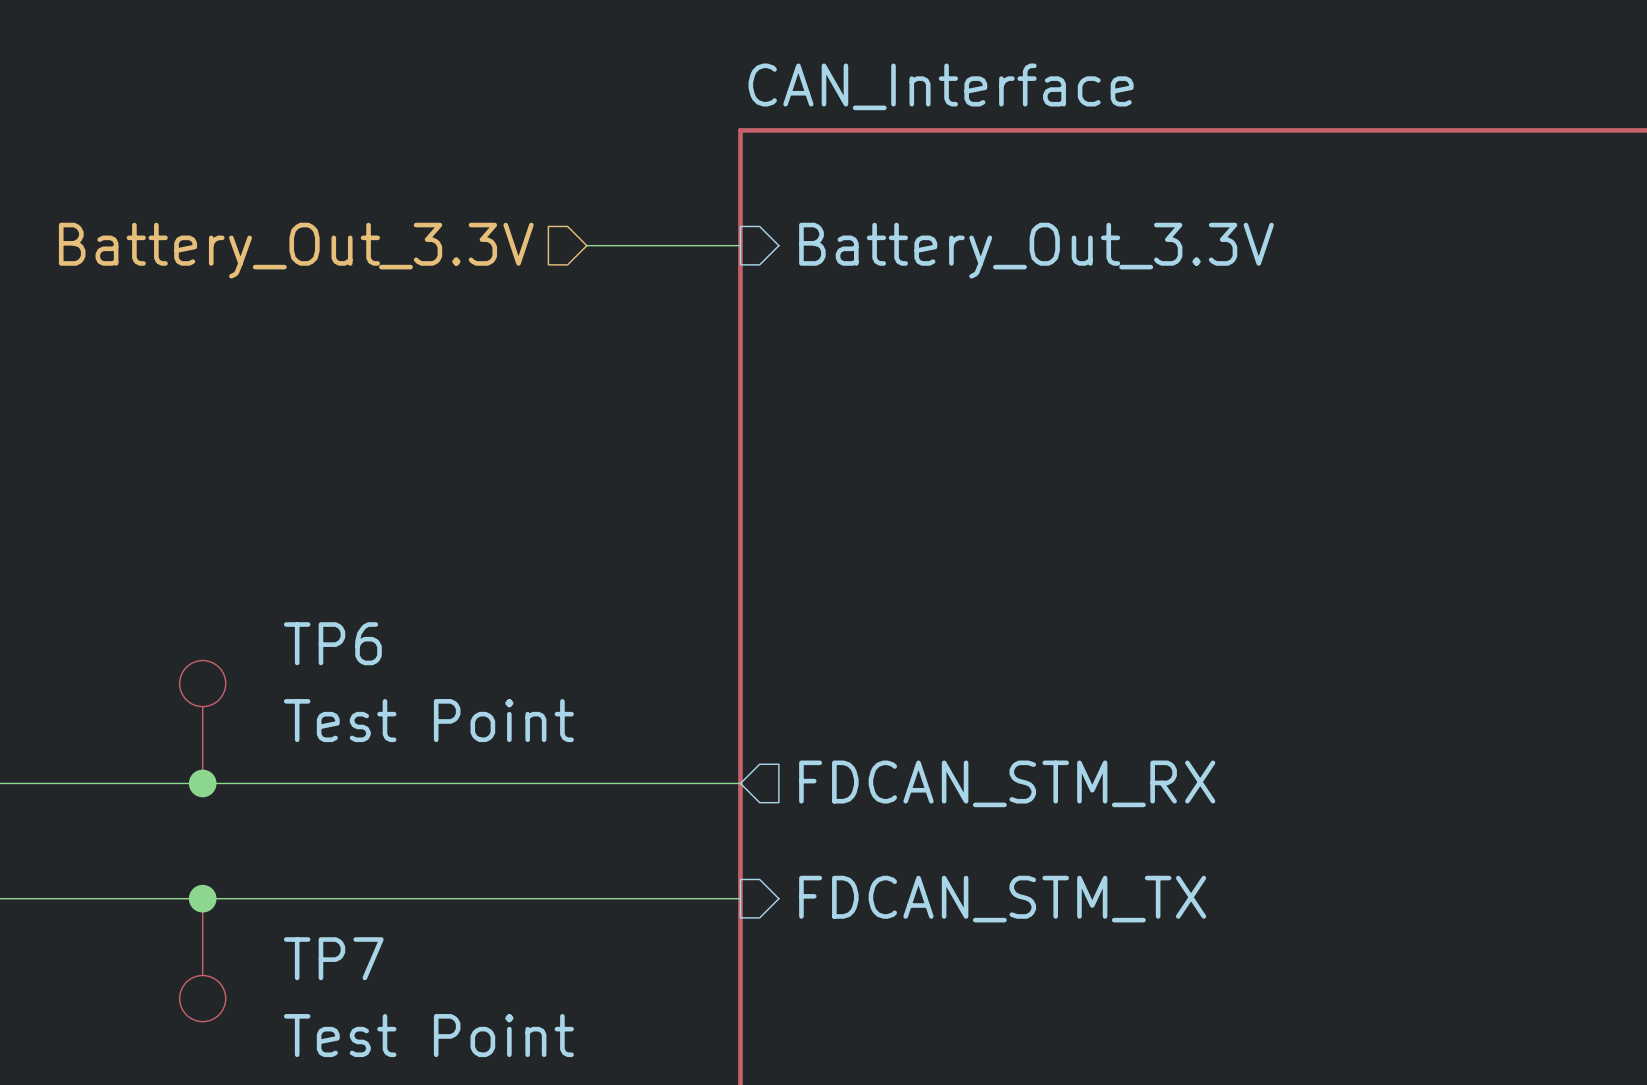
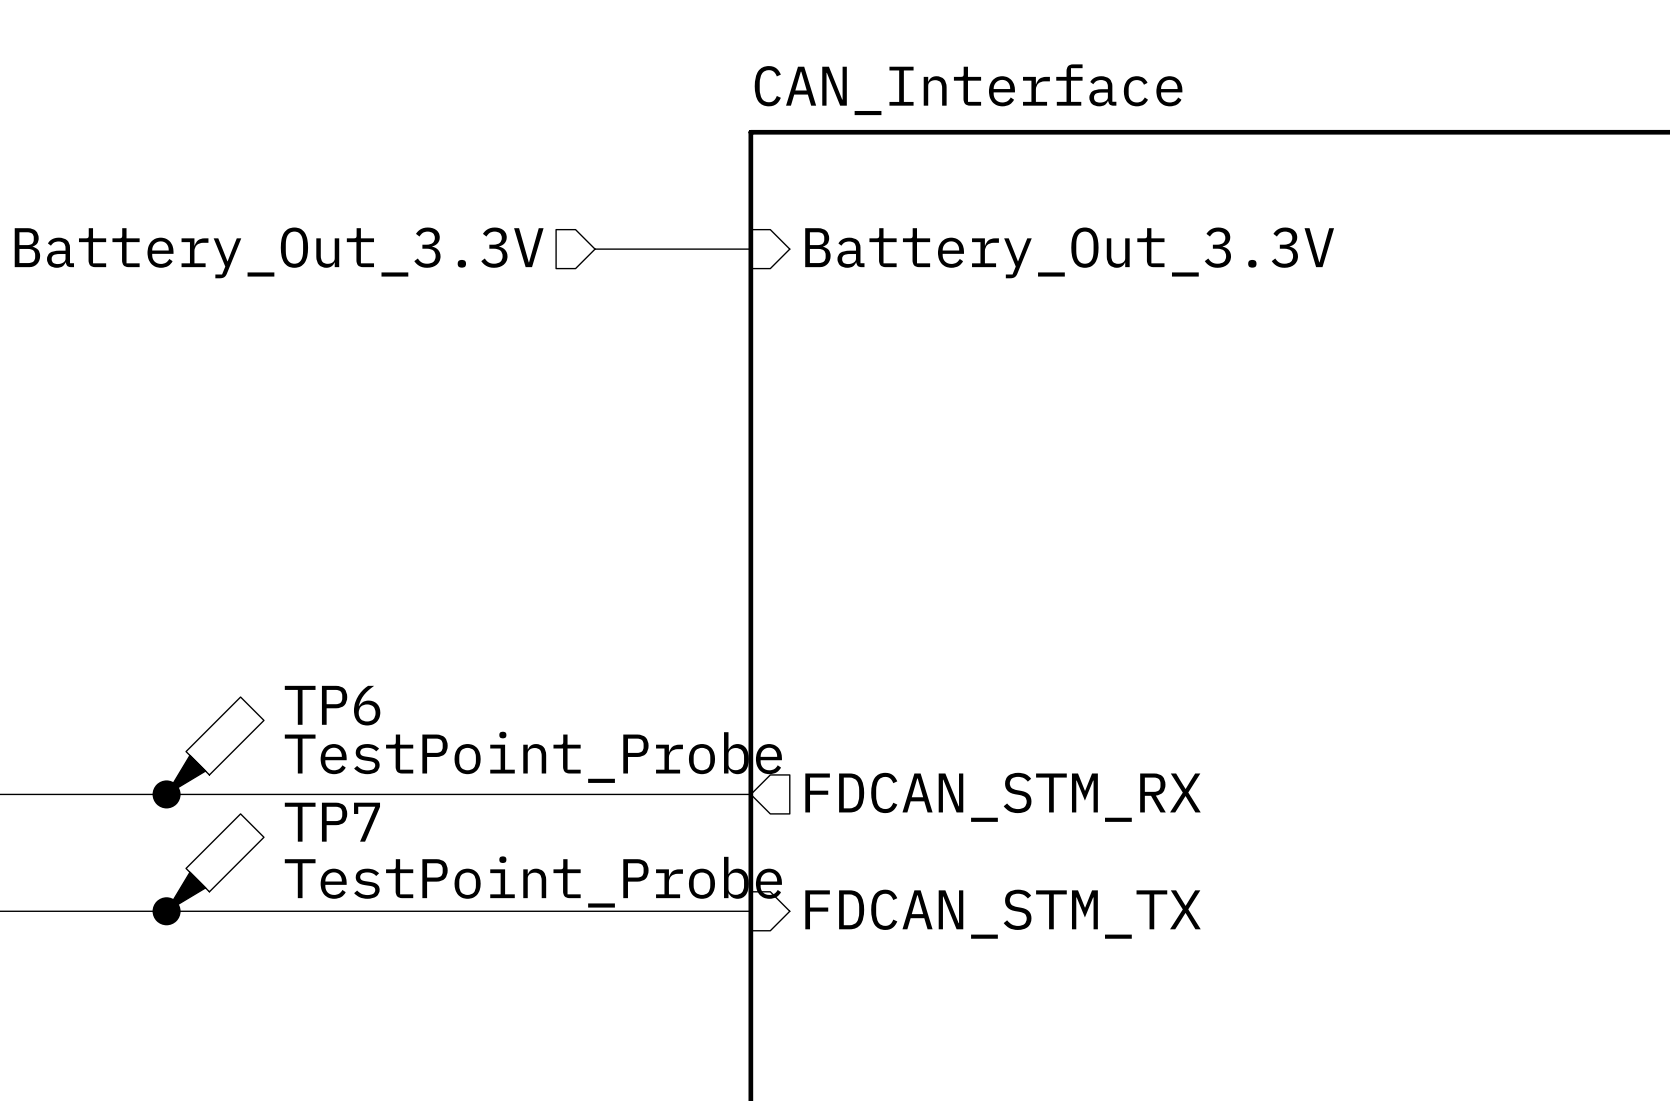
TP6 symbol: [179, 660, 226, 784] -> [166, 697, 264, 795]
TP6 value: Test Point (428, 720) -> TestPoint_Probe (533, 757)
junction position: (202, 783) -> (166, 794)
TP7 symbol: [179, 898, 226, 1022] -> [166, 813, 264, 912]
junction position: (202, 898) -> (166, 911)
TP7 value: Test Point (428, 1035) -> TestPoint_Probe (533, 881)

